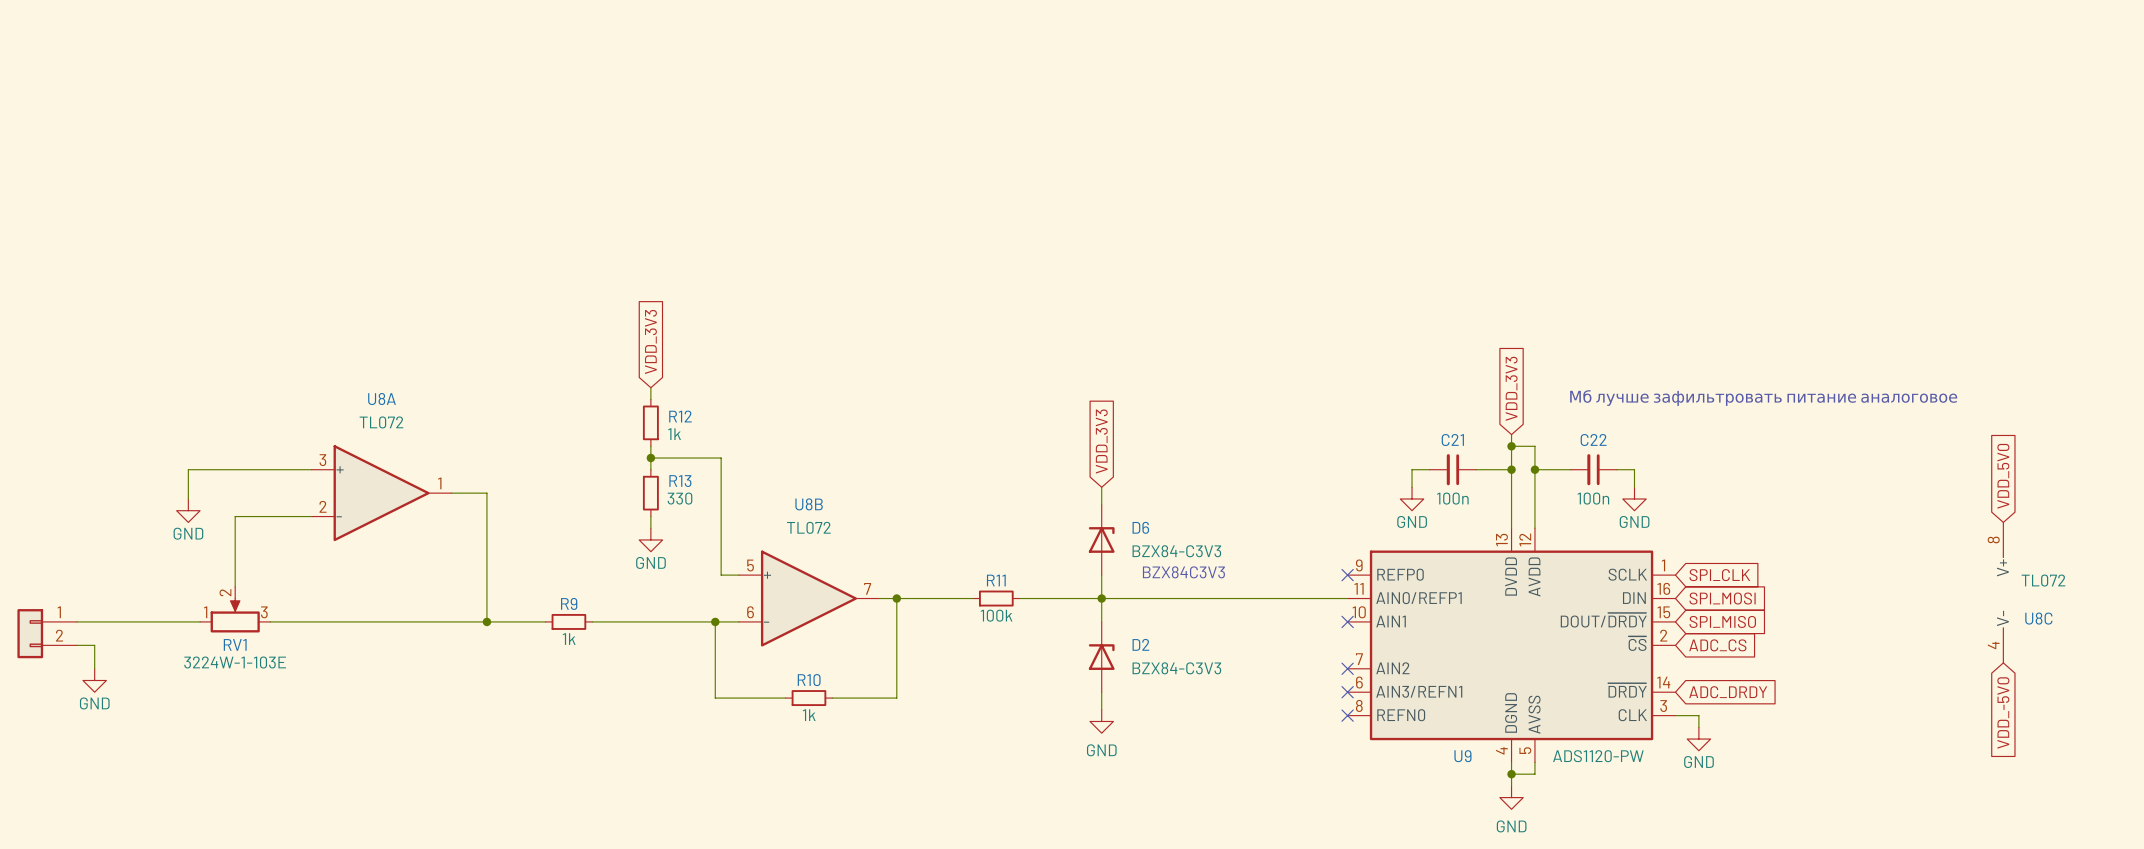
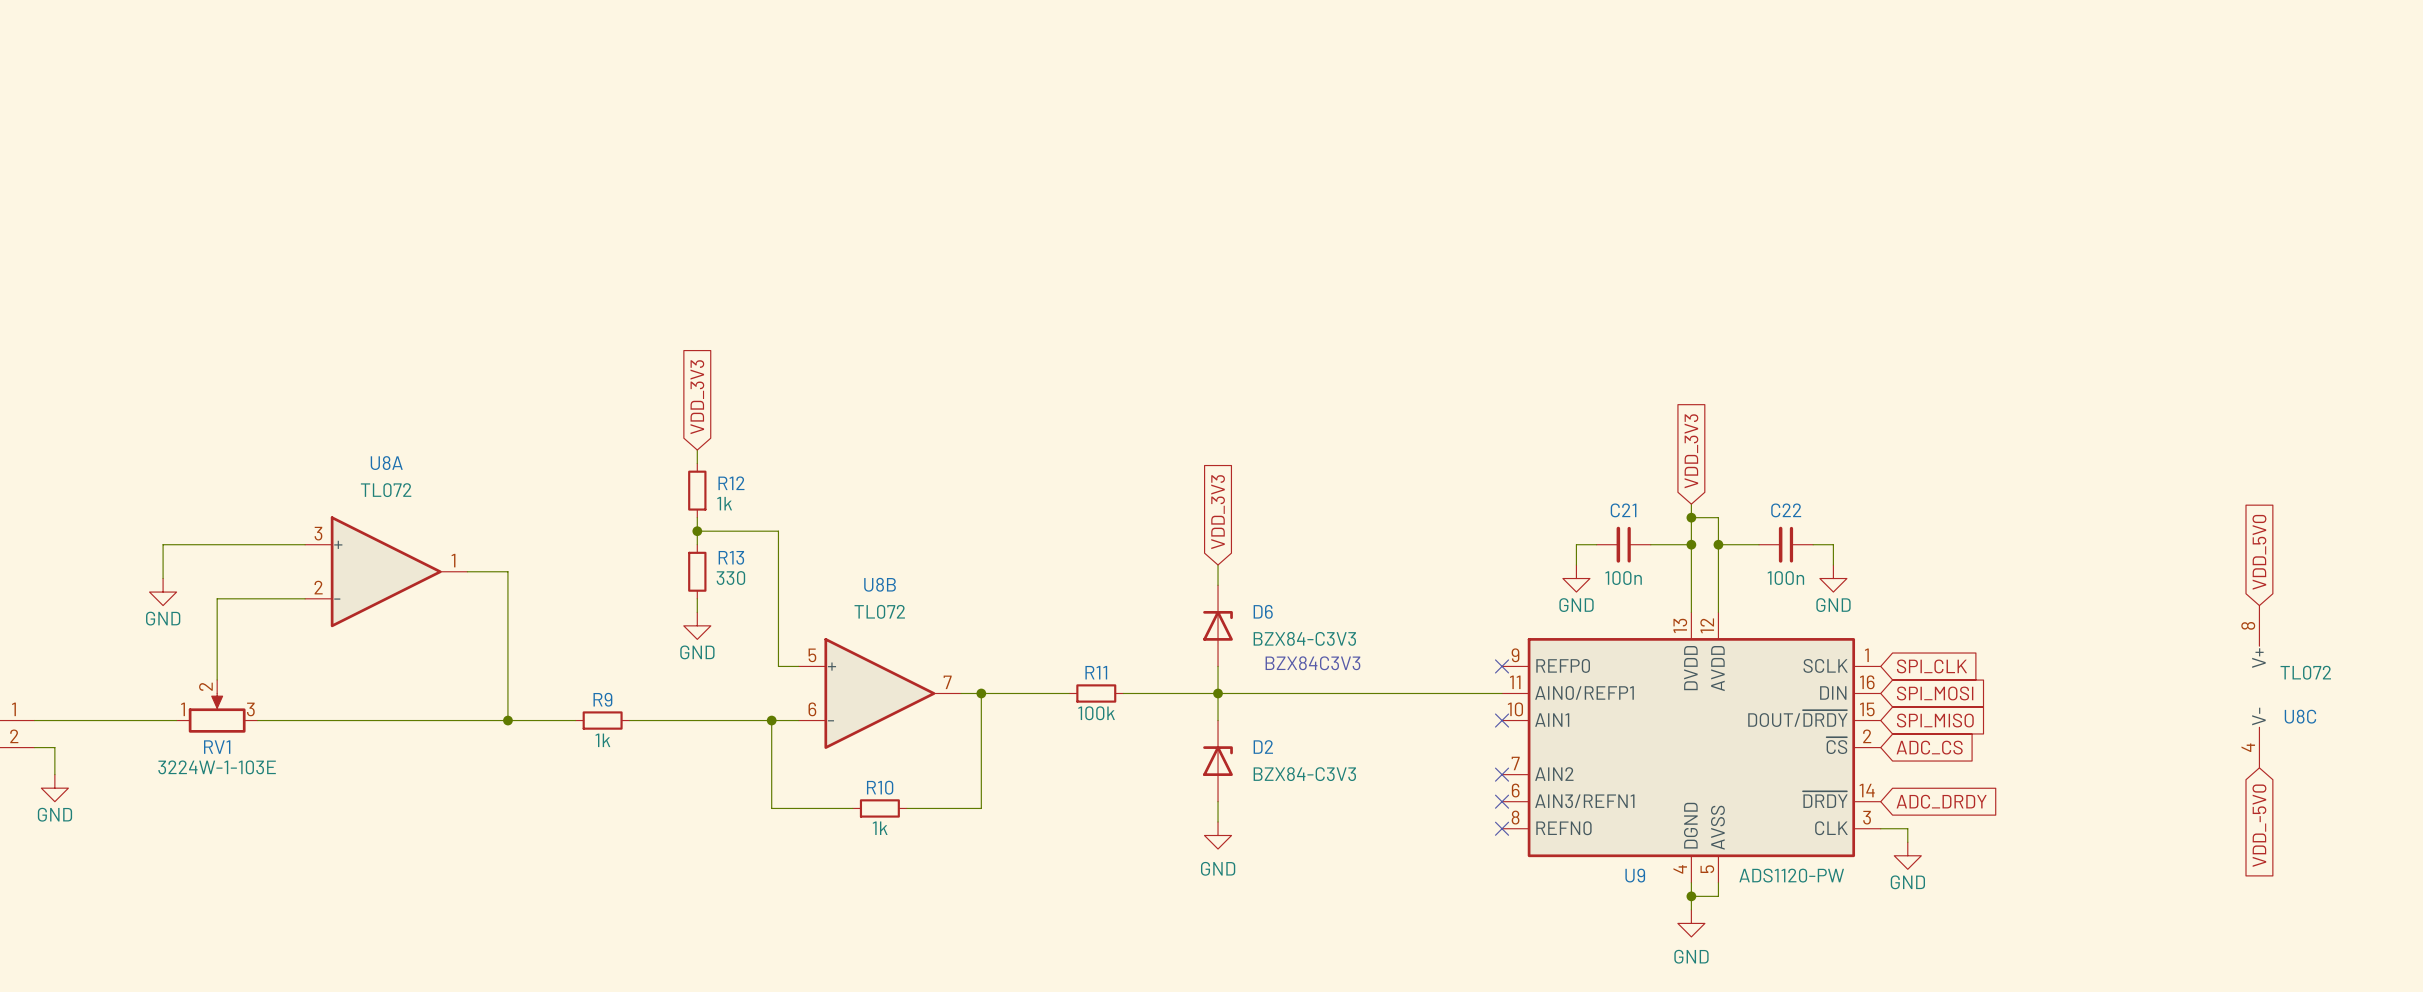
text: Мб лучше зафильтровать питание аналоговое (1763, 398) -> none

